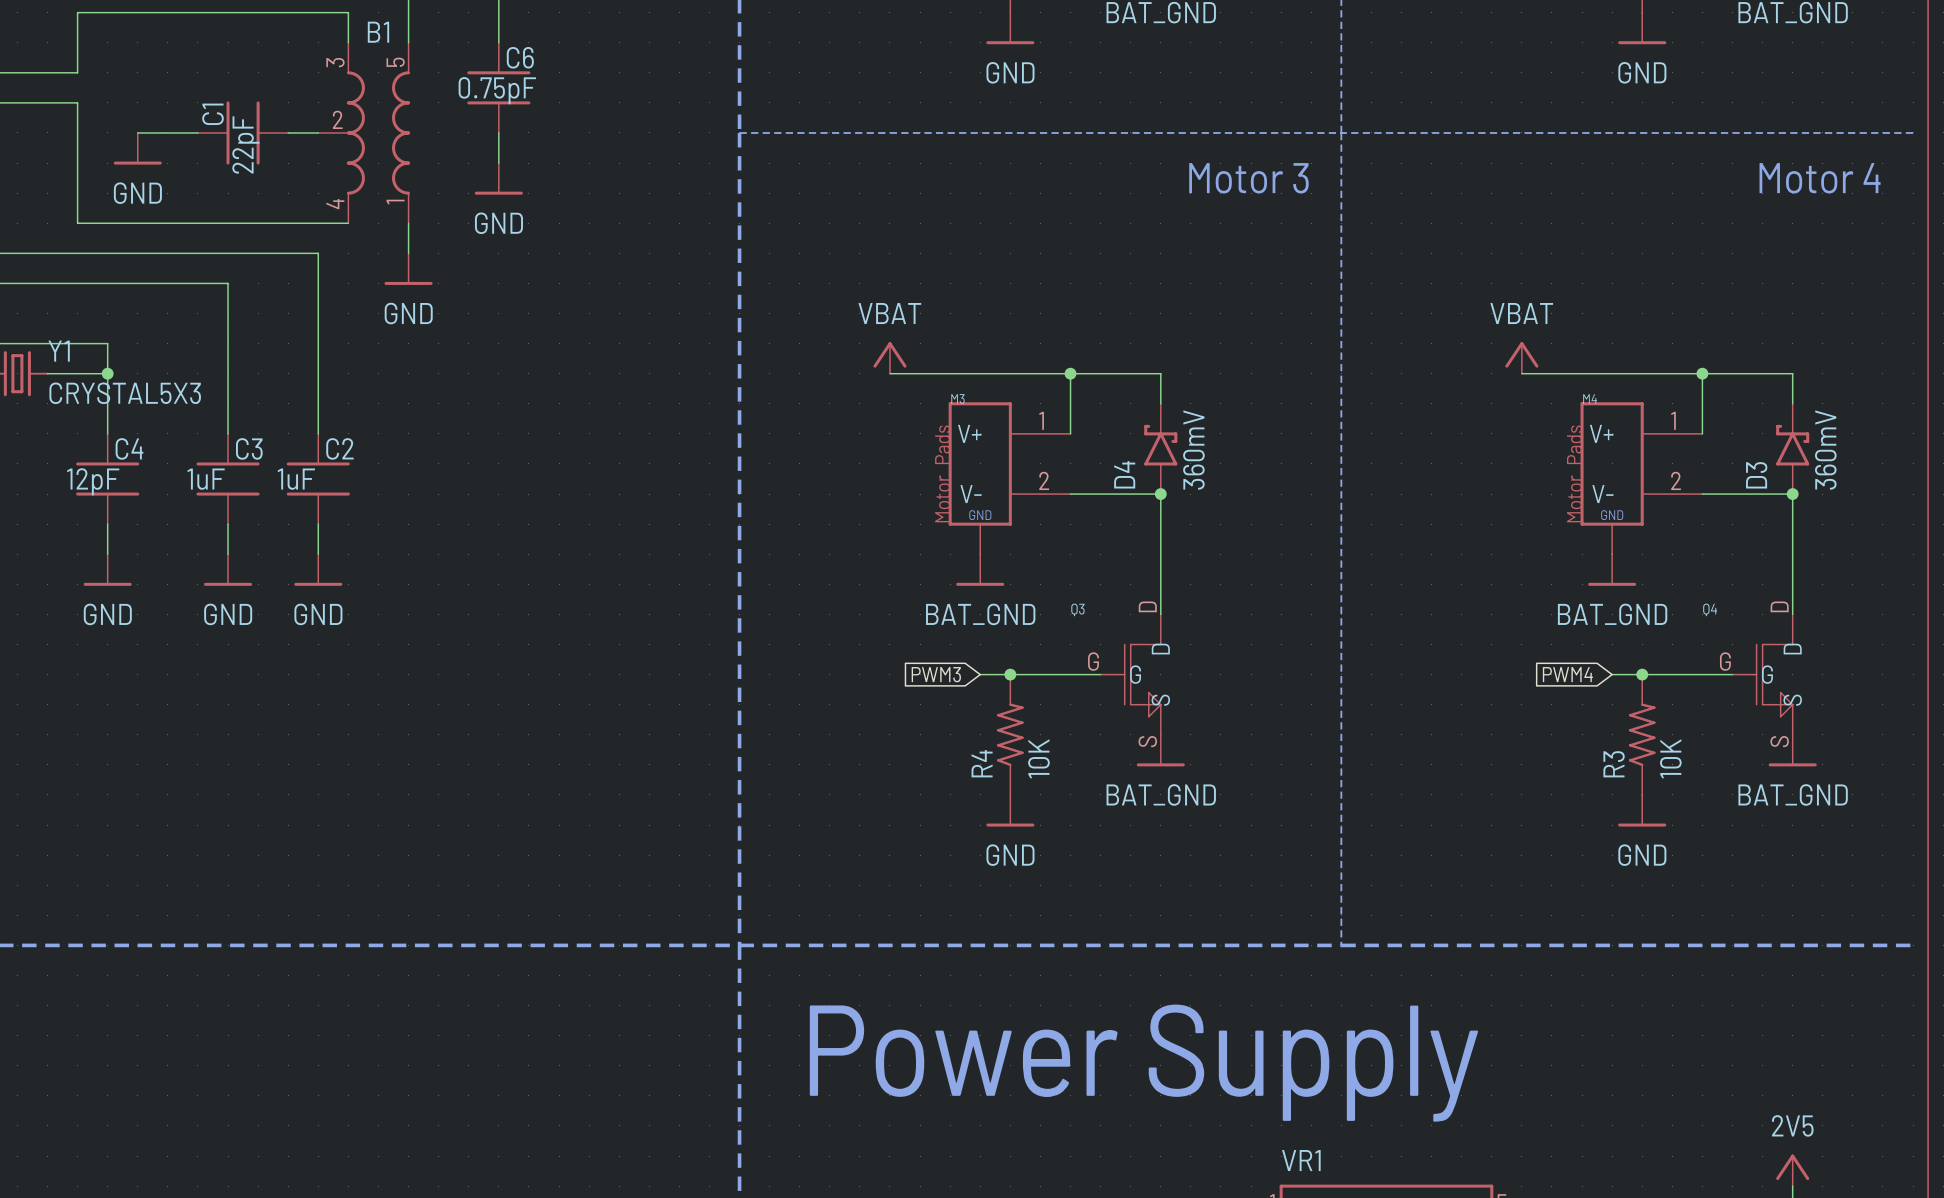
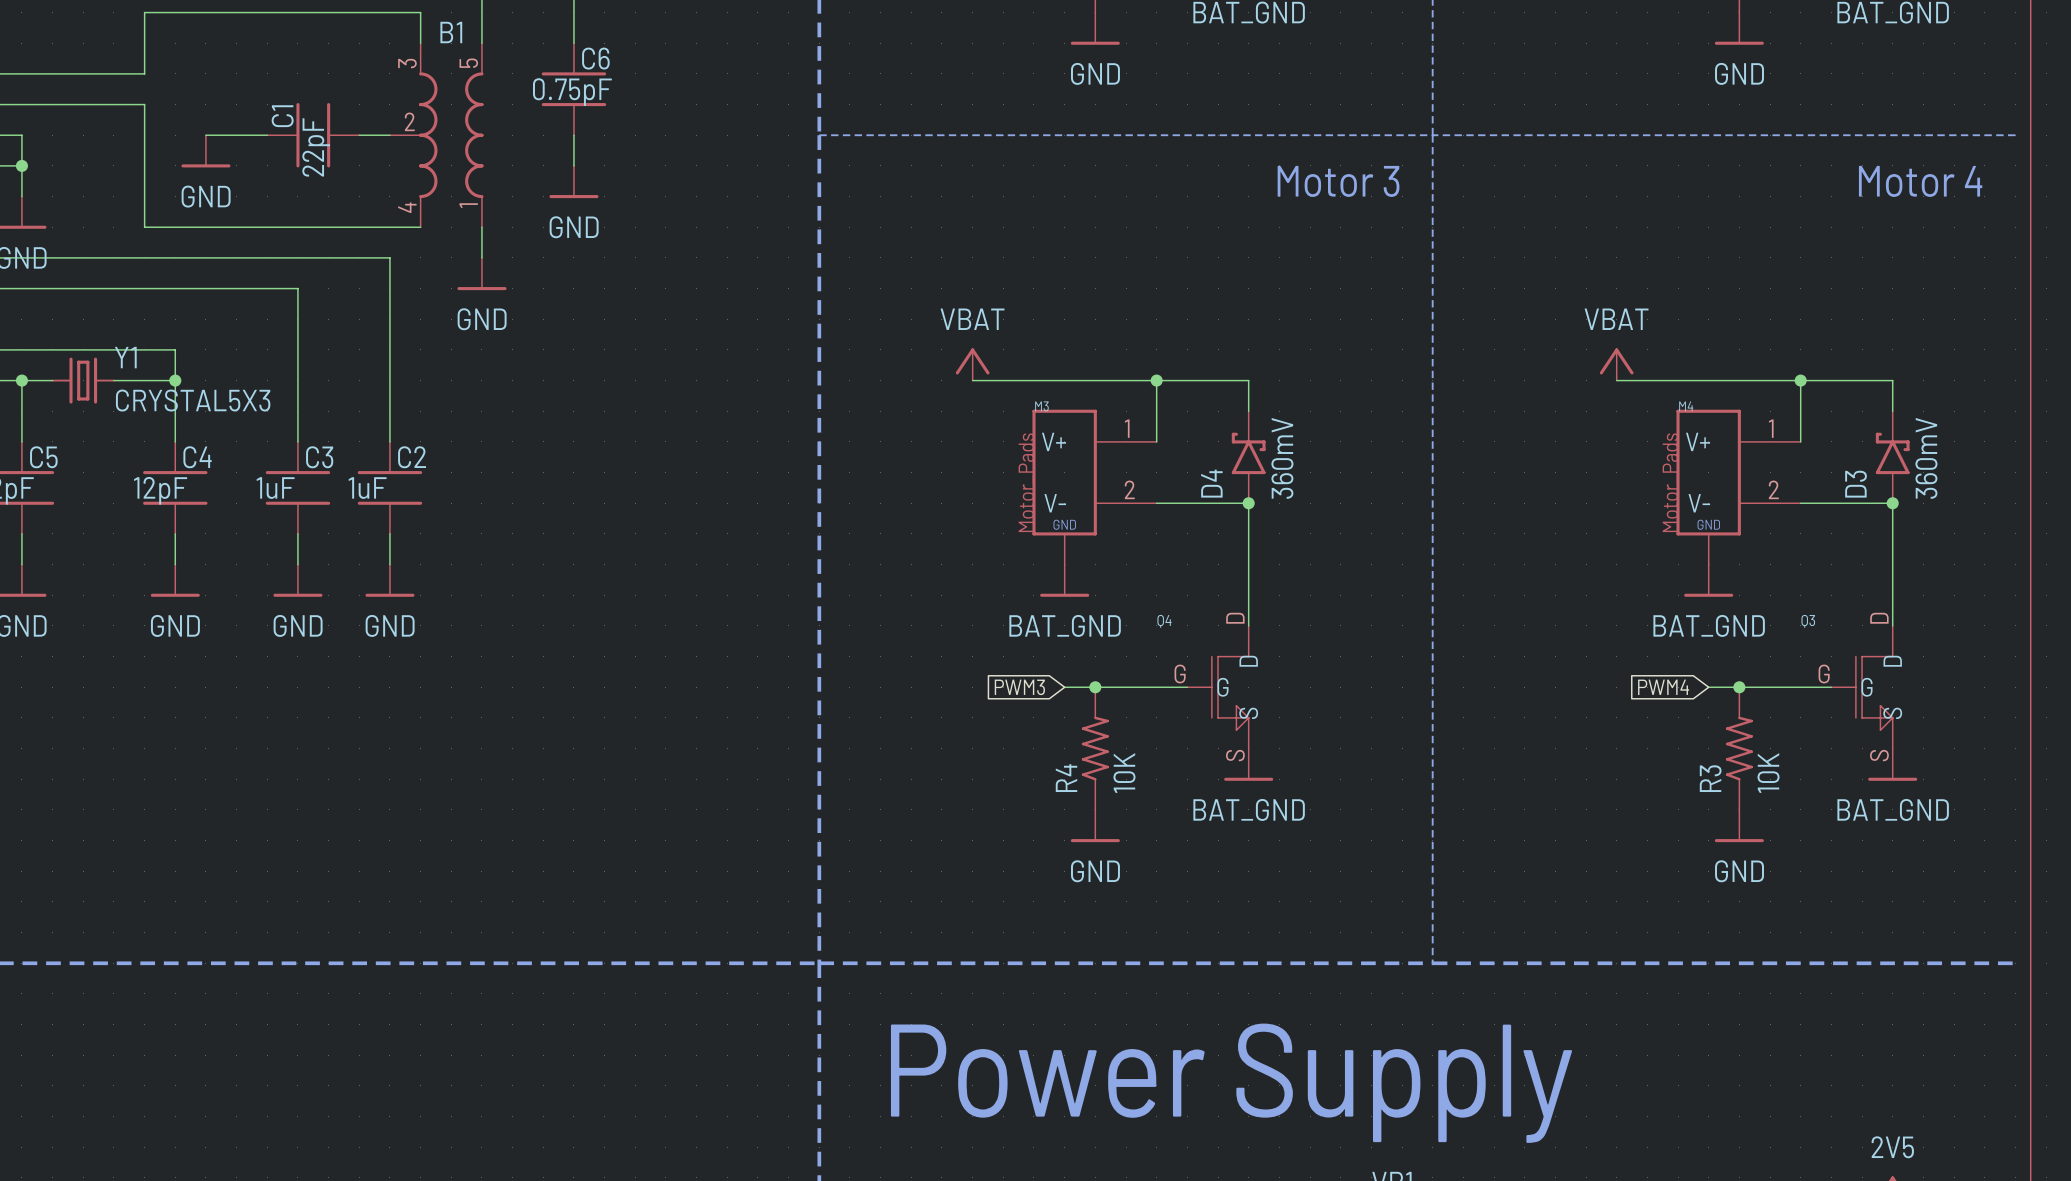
Q3 name: Q3 (1077, 609) -> Q4 (1164, 621)
Q4 name: Q4 (1710, 609) -> Q3 (1808, 621)

